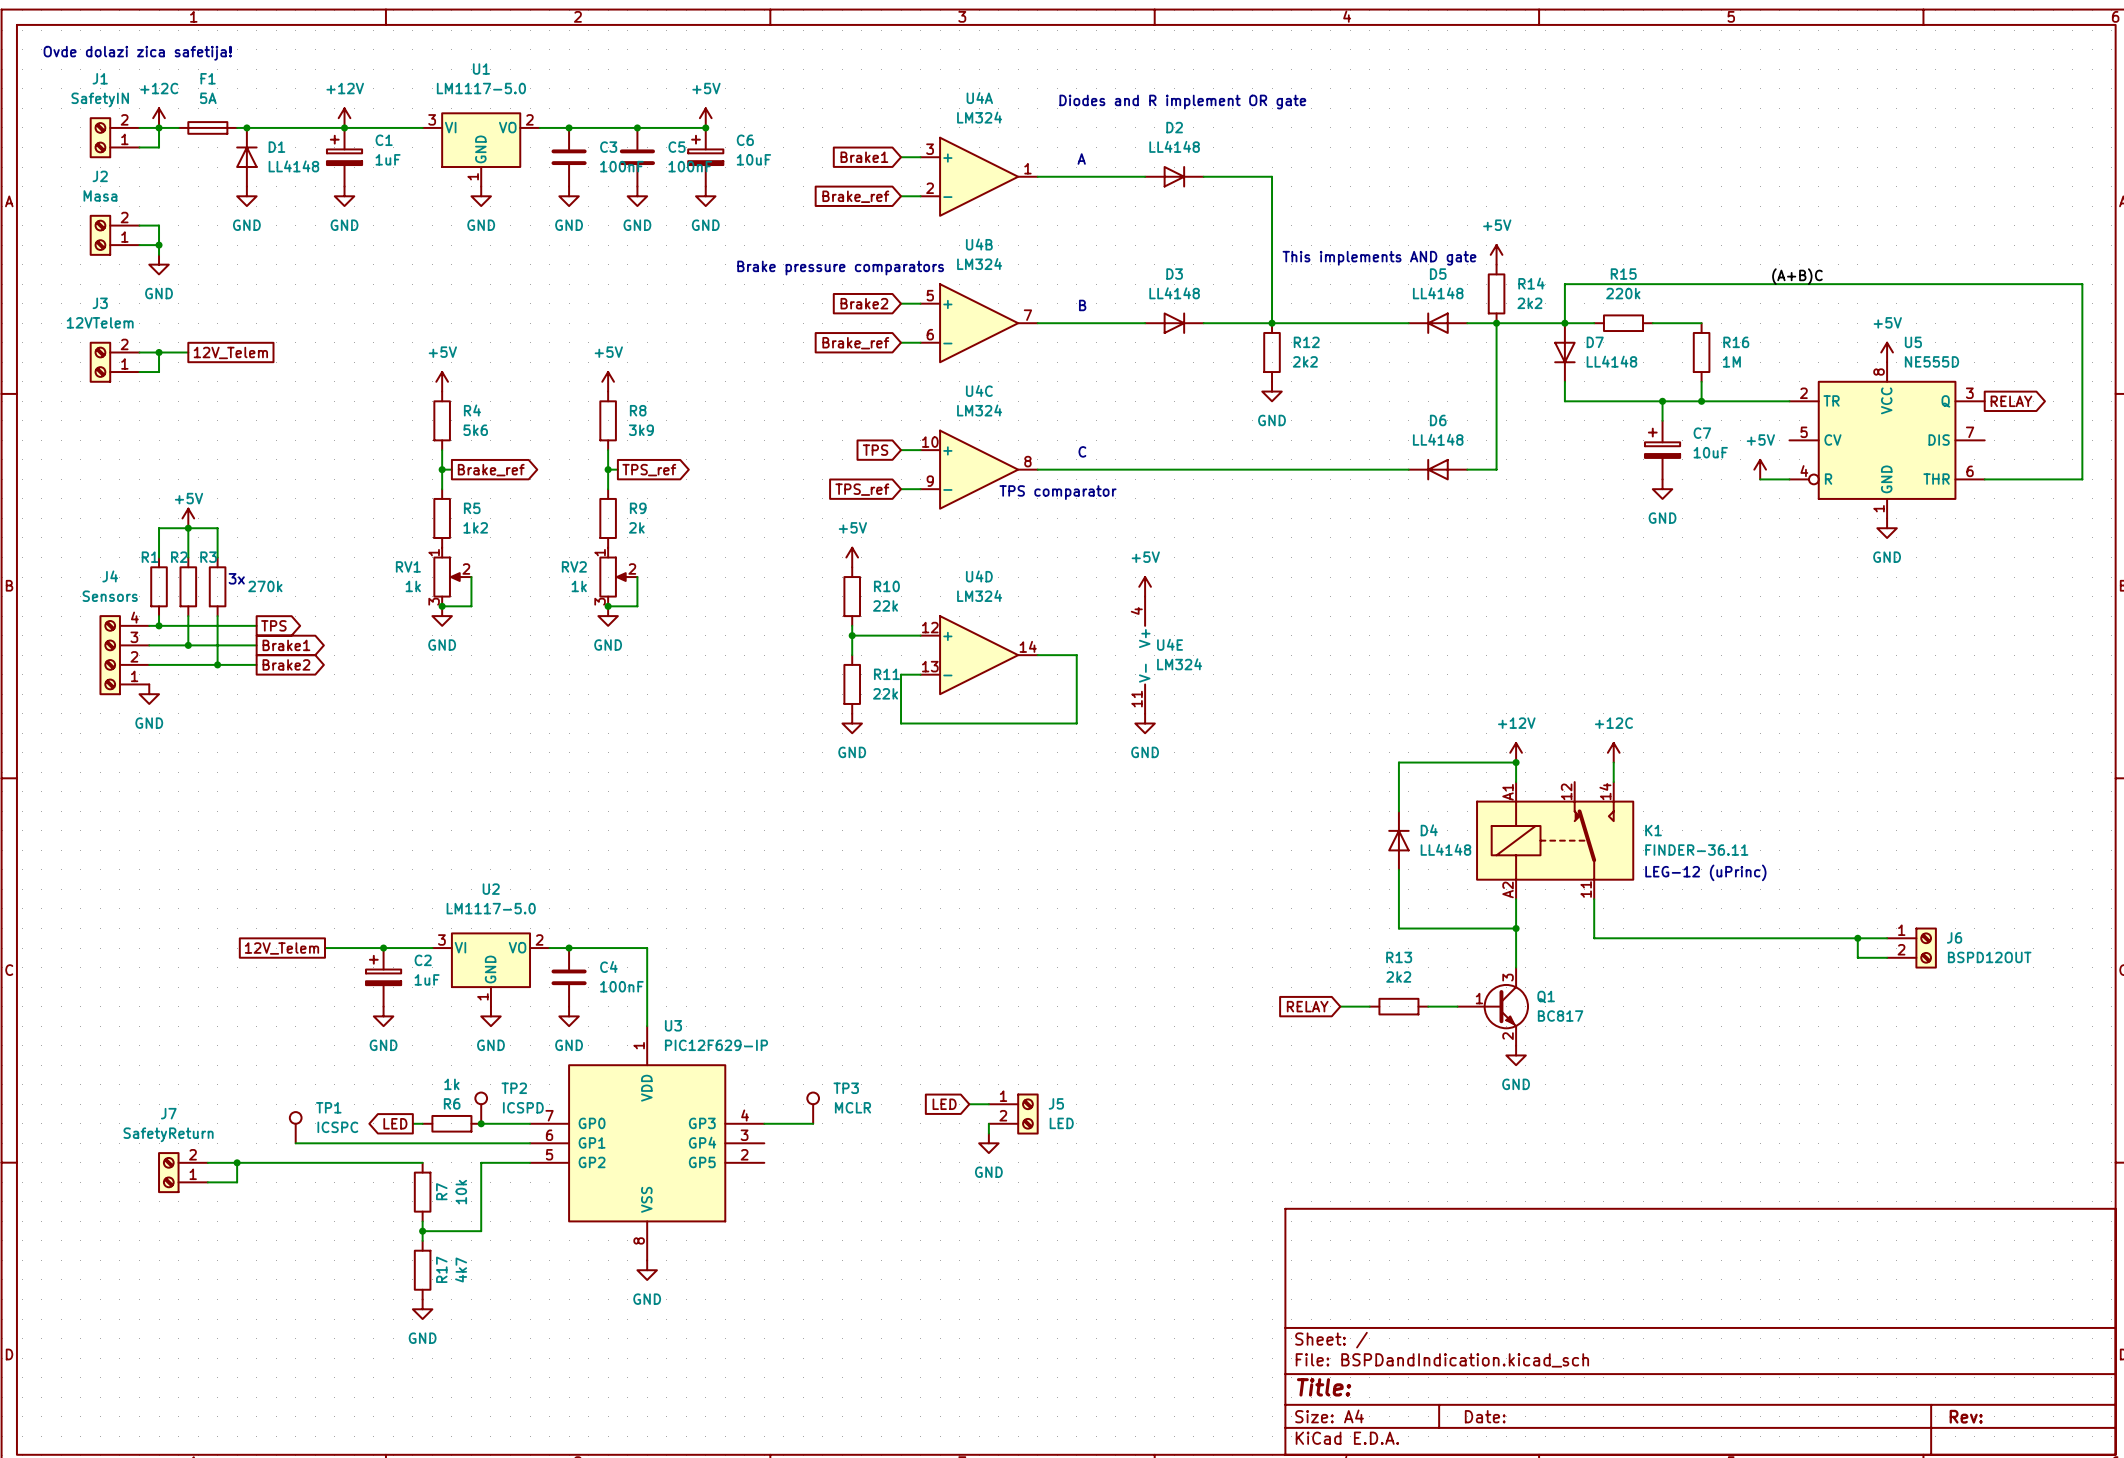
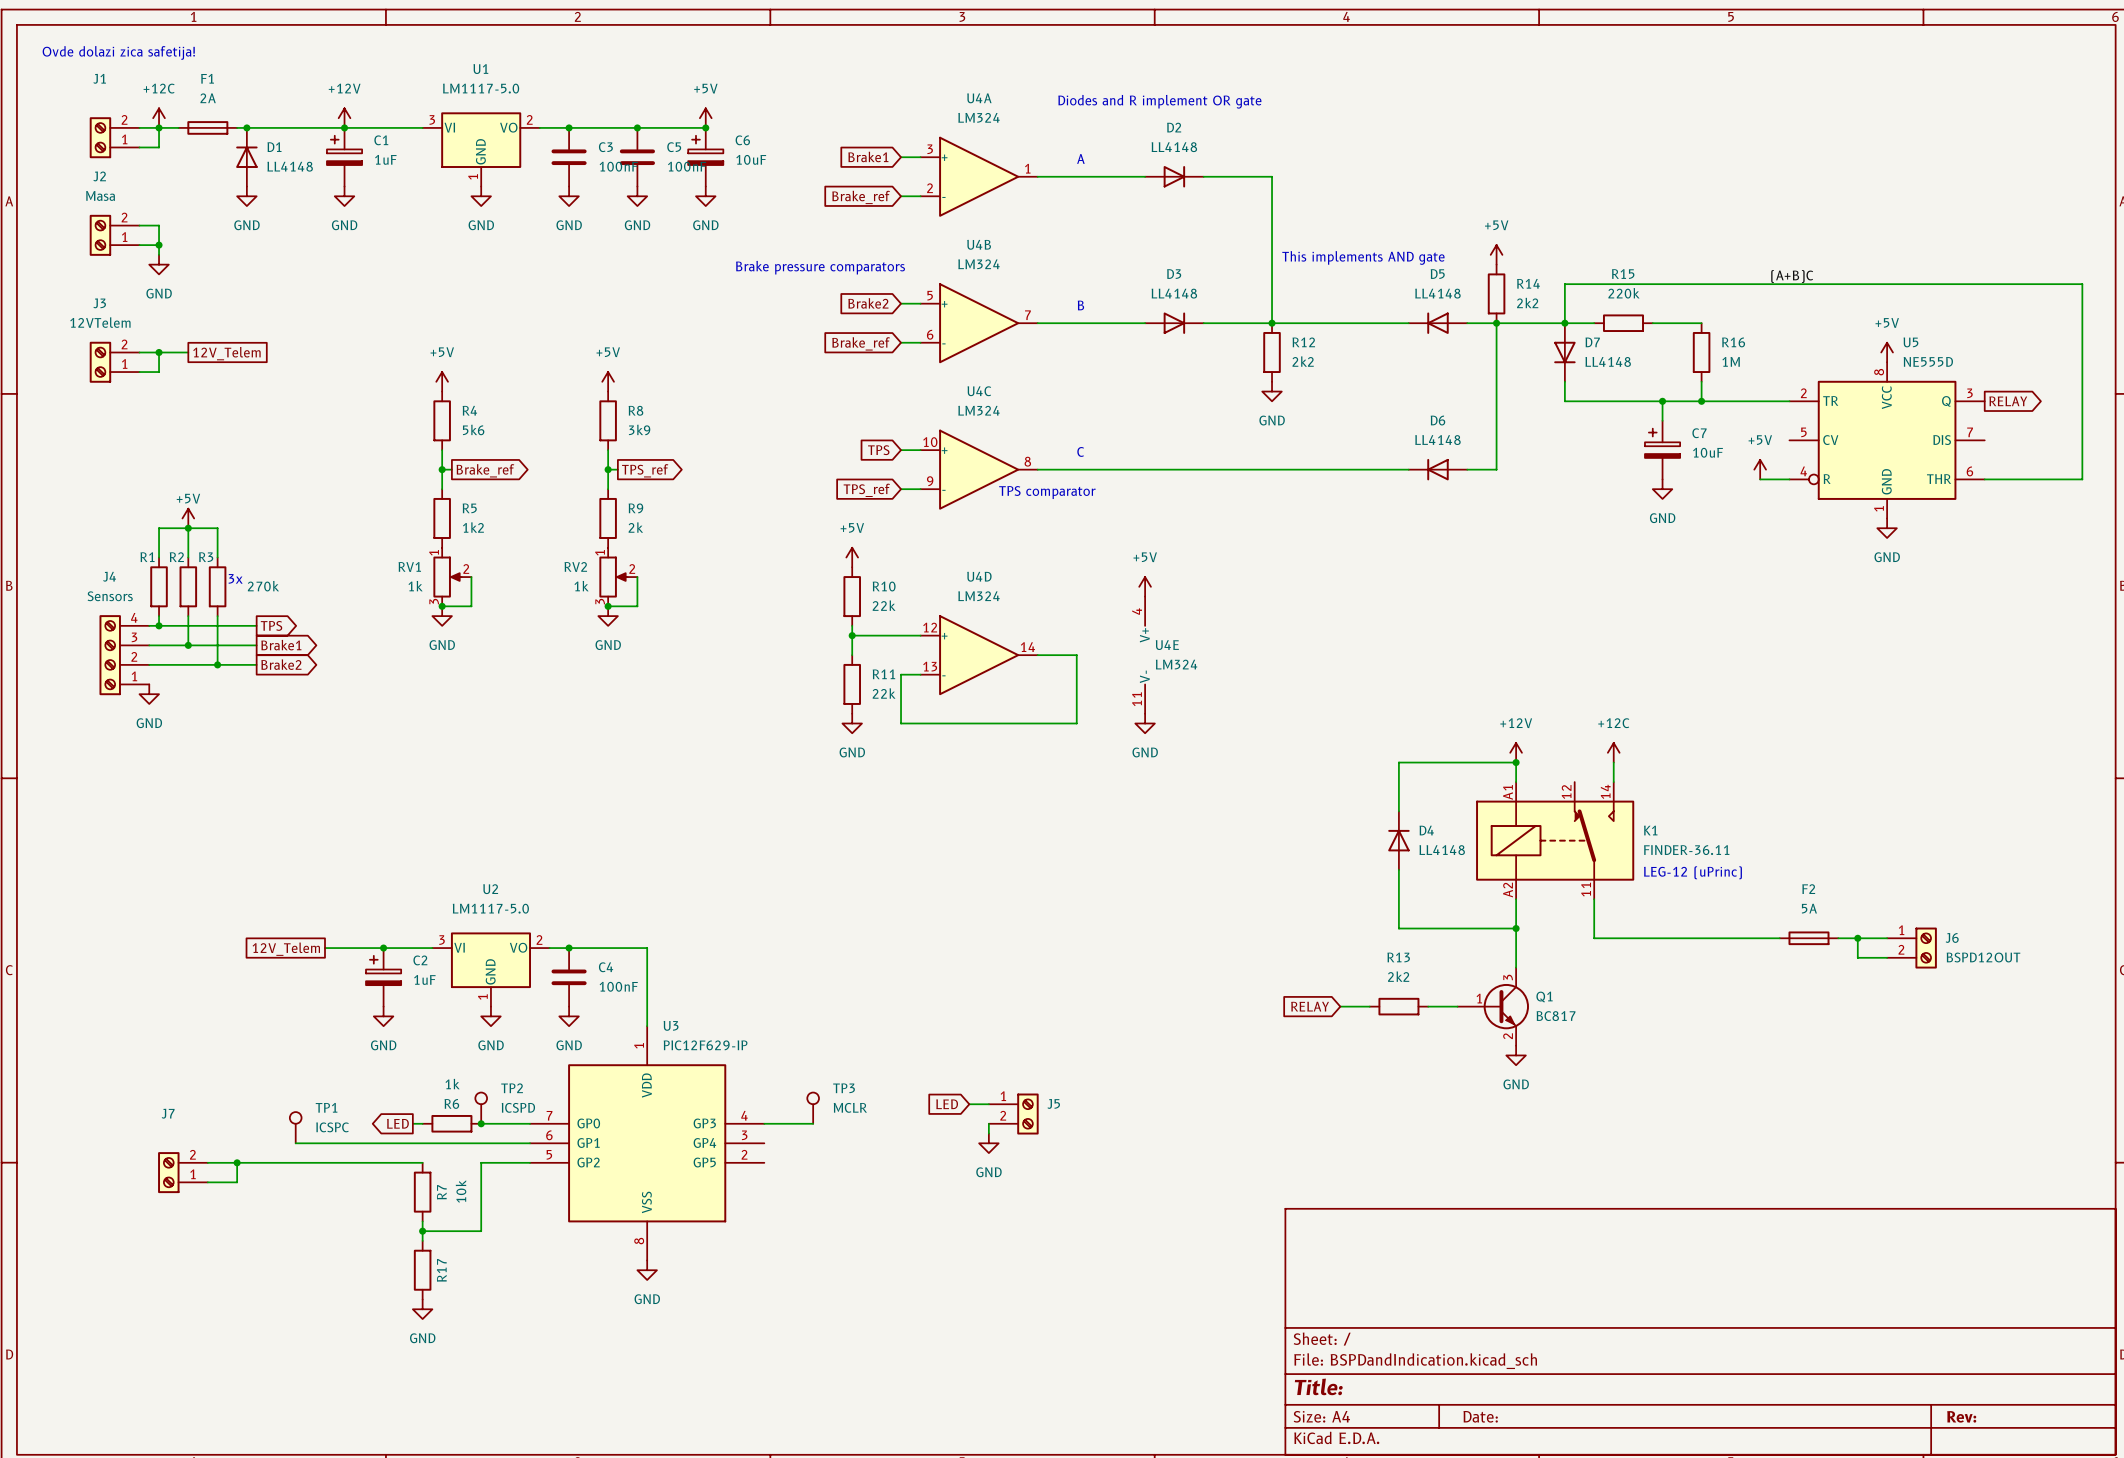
F1 value: 5A (208, 98) -> 2A (208, 98)
J1 value: SafetyIN (100, 99) -> none
F2: none -> 5A (1808, 938)
J5 value: LED (1061, 1123) -> none
J7 value: SafetyReturn (168, 1134) -> none
R17 value: 4k7 (461, 1269) -> none

